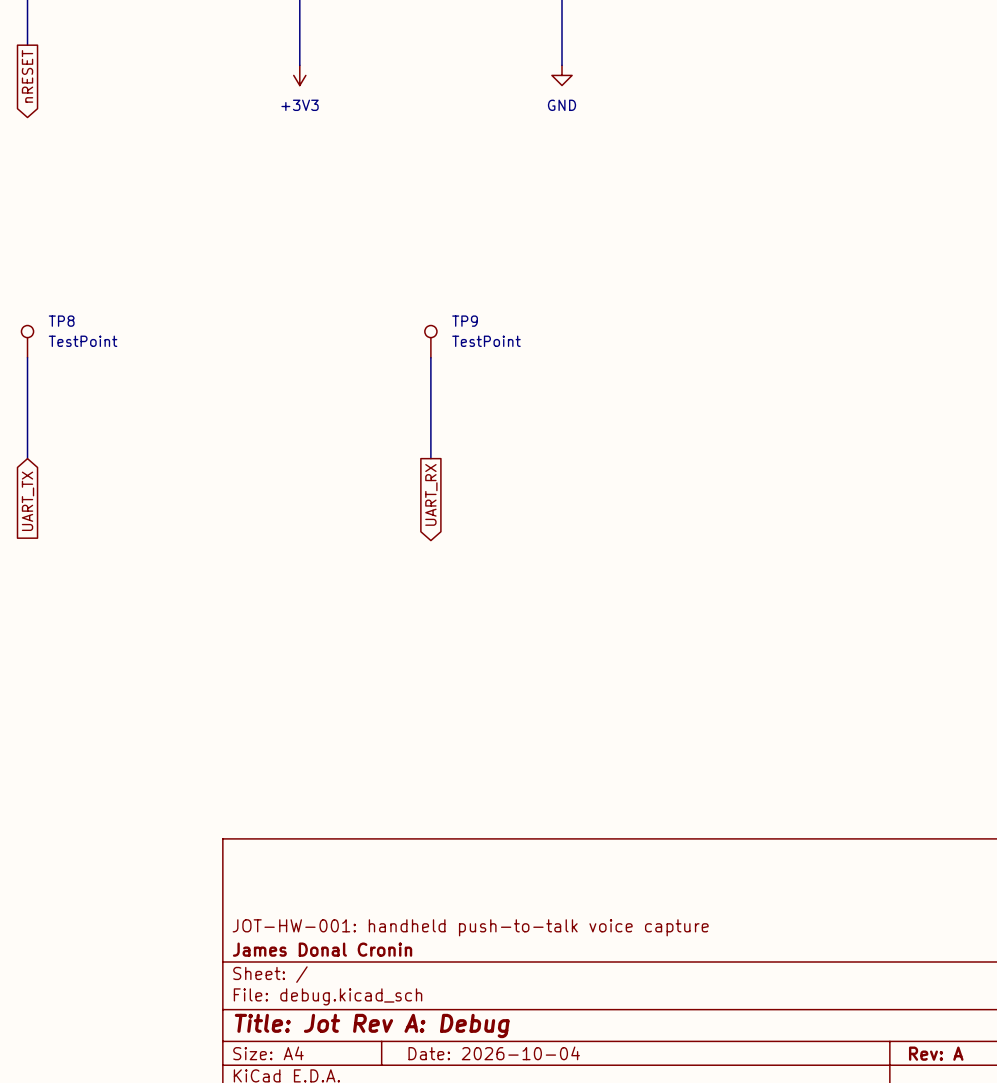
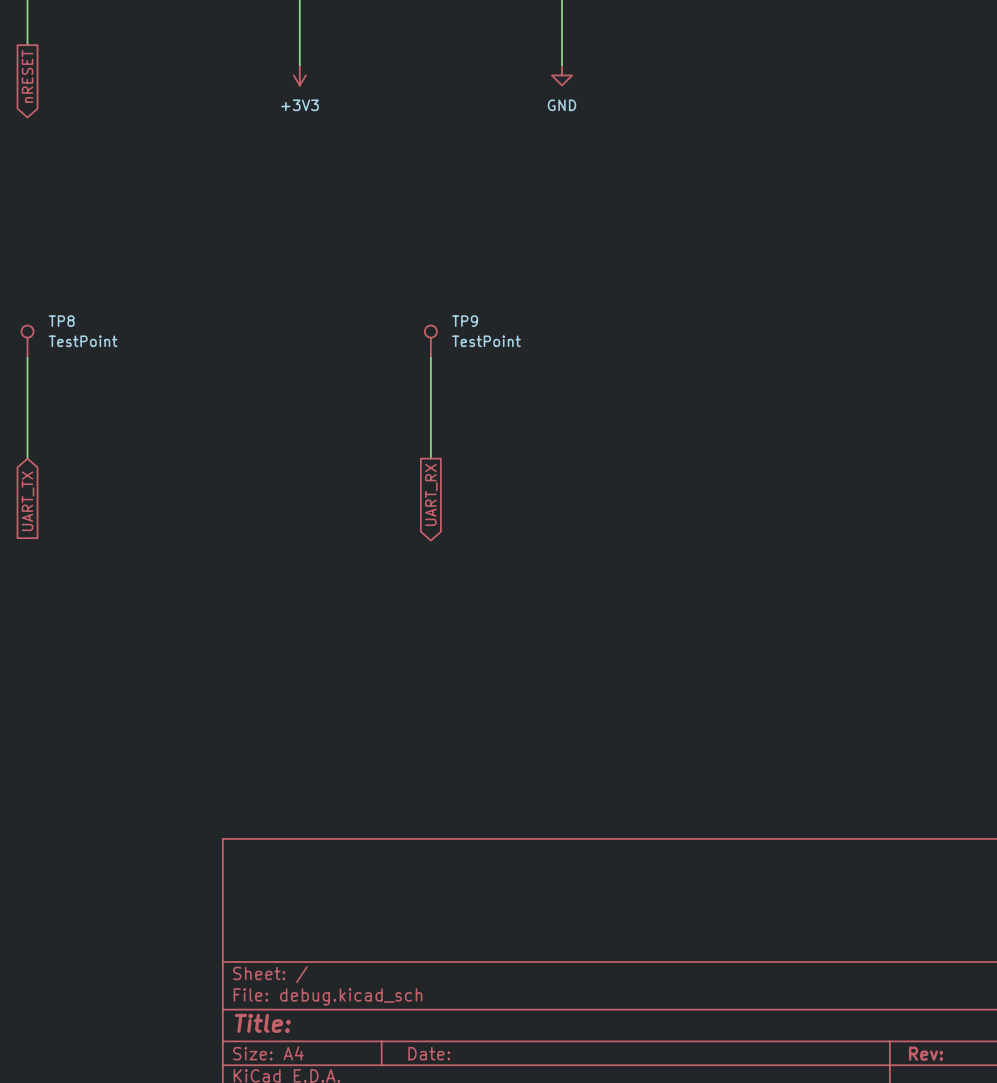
title block: JOT-HW-001: handheld push-to-talk voice capture (470, 927) -> none
title block: James Donal Cronin (322, 949) -> none
title block: Title: Jot Rev A: Debug (372, 1025) -> Title: (262, 1023)
title block: Date: 2026-10-04 (494, 1053) -> Date: (429, 1053)
title block: Rev: A (936, 1053) -> Rev: (926, 1053)

